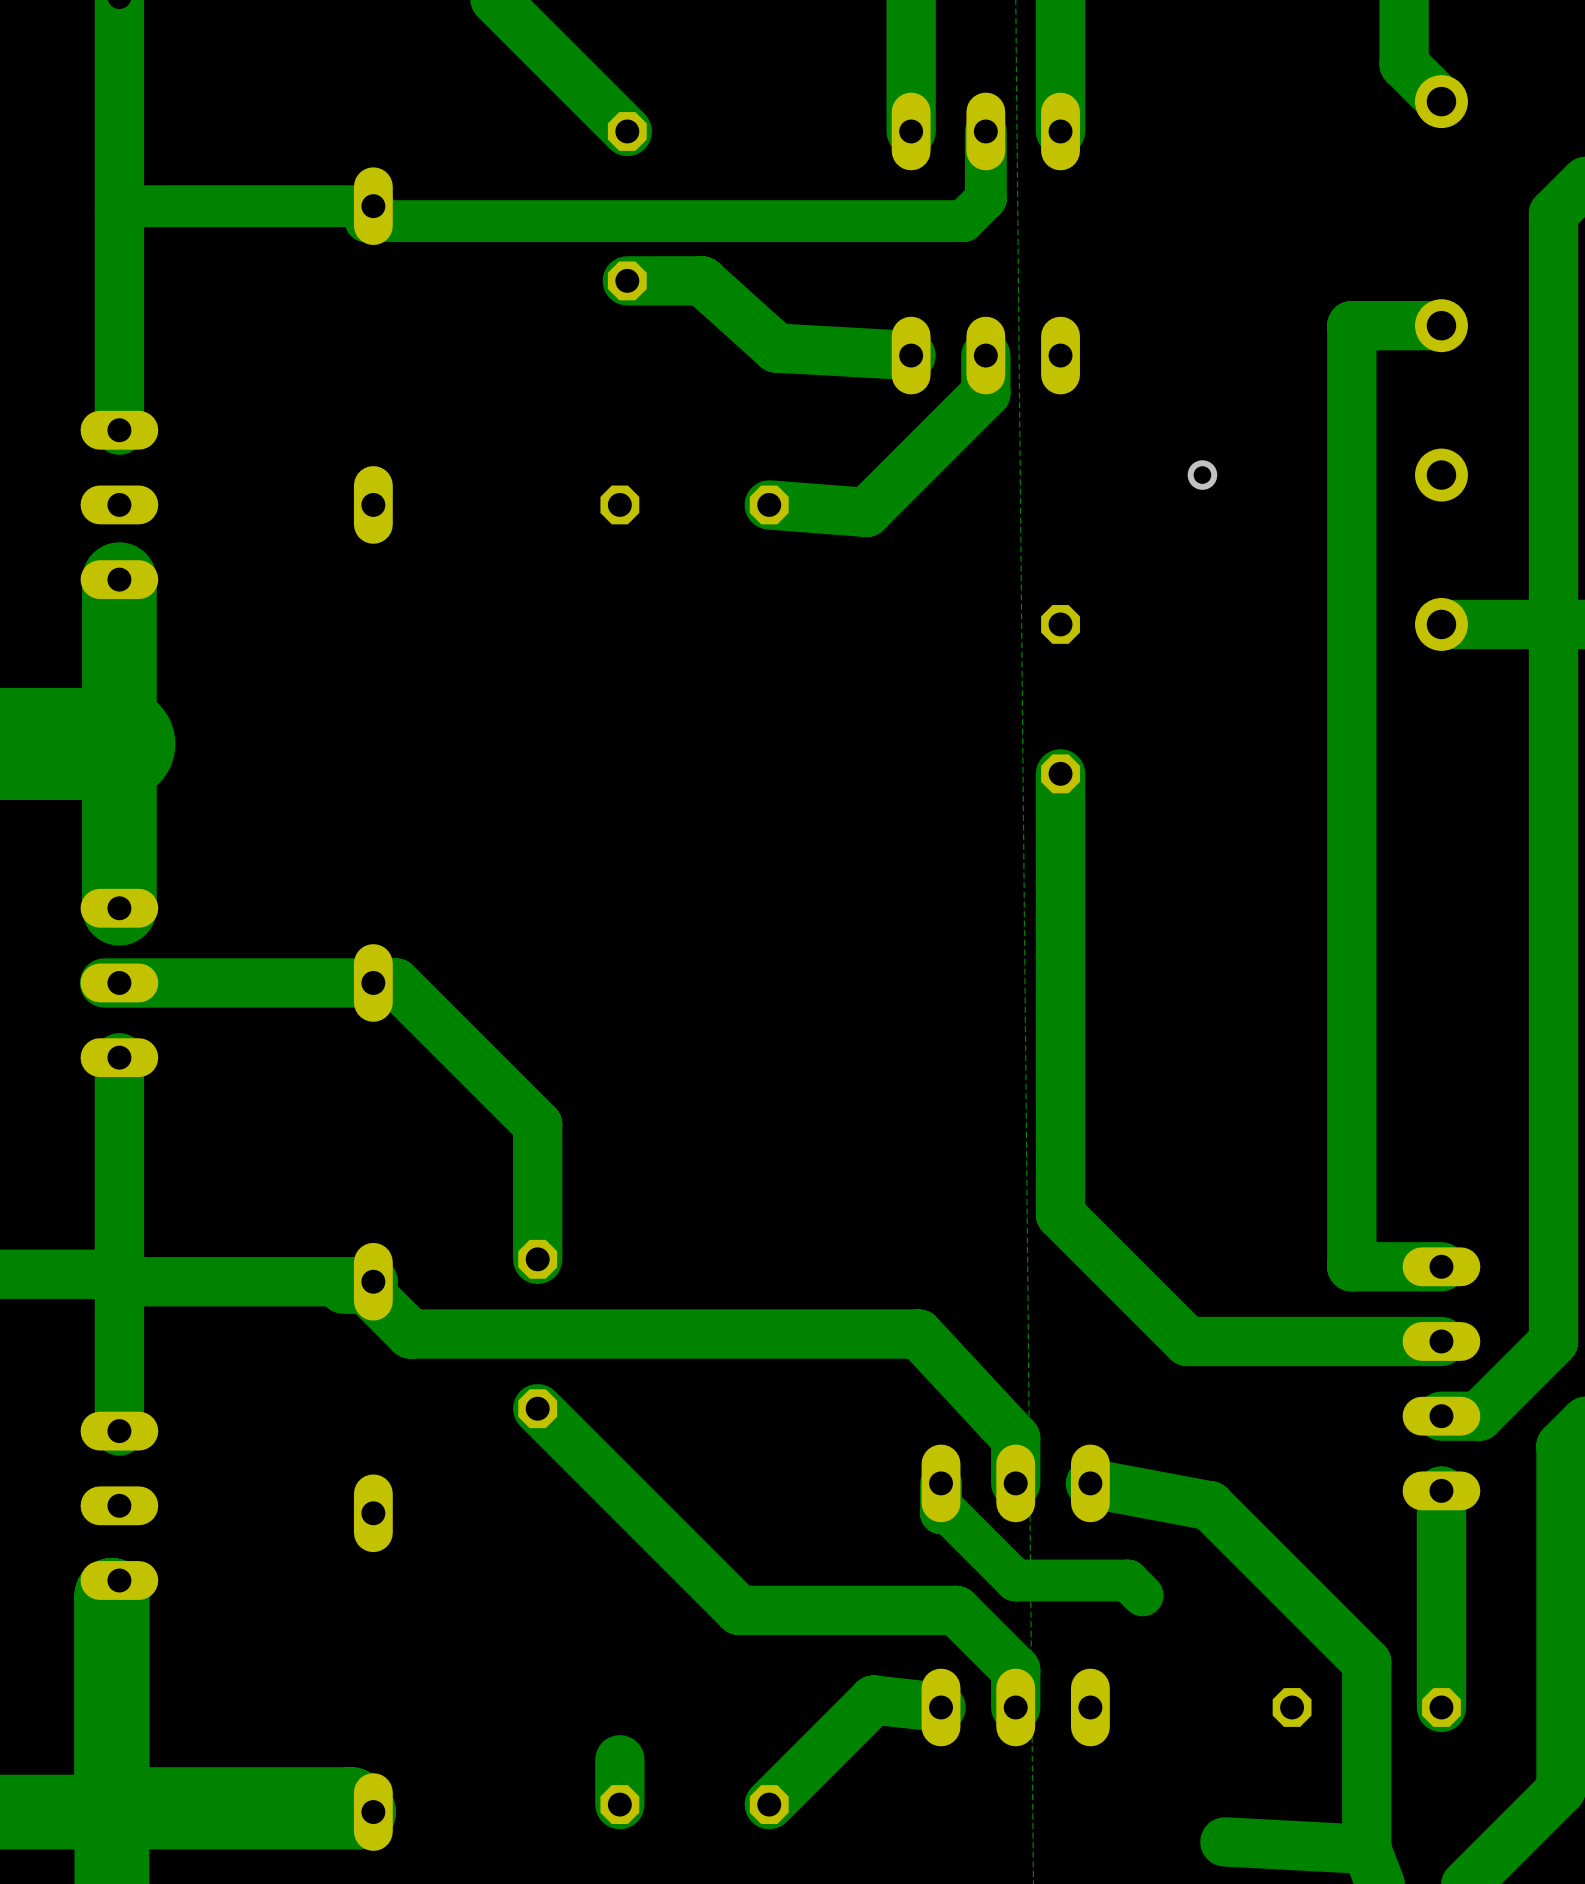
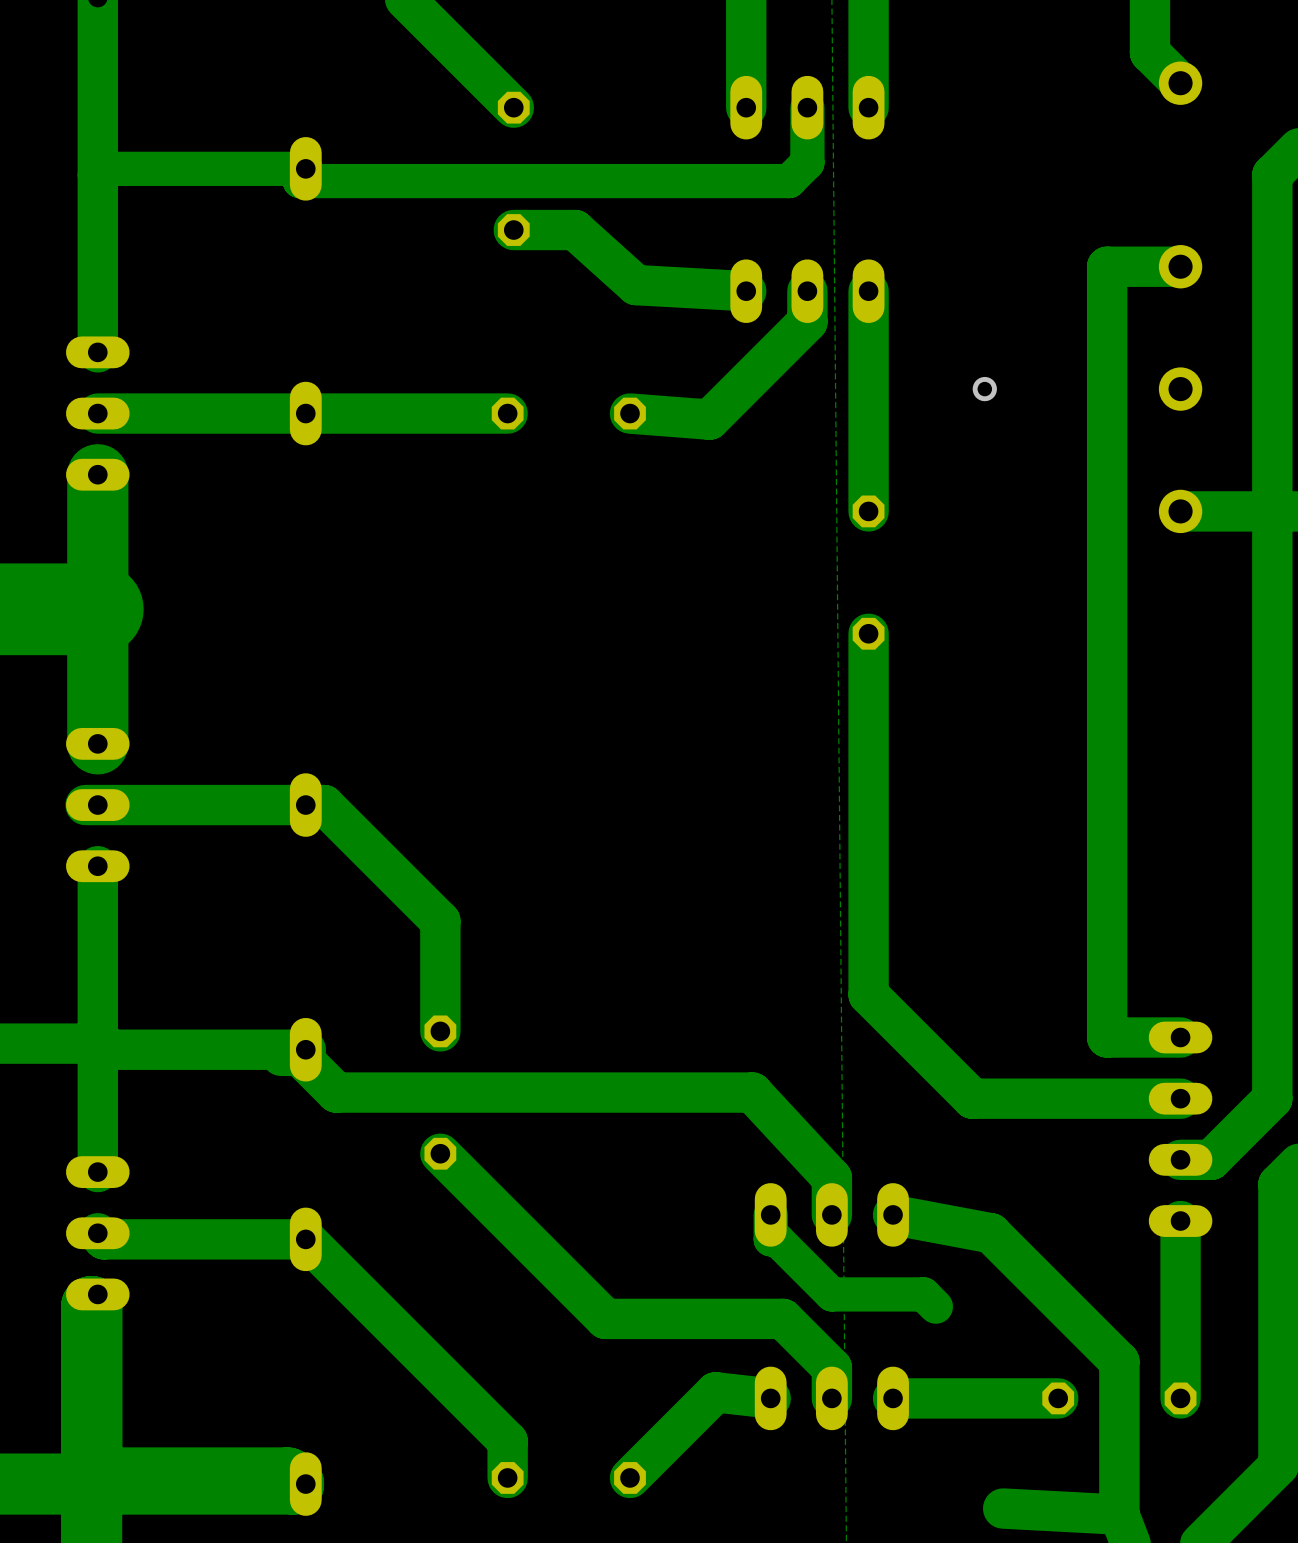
track: none -> (868, 291) (868, 511)
track: none -> (507, 413) (97, 413)
track: none -> (97, 1233) (103, 1239) (305, 1239) (507, 1441)
track: none -> (1058, 1398) (893, 1398)

